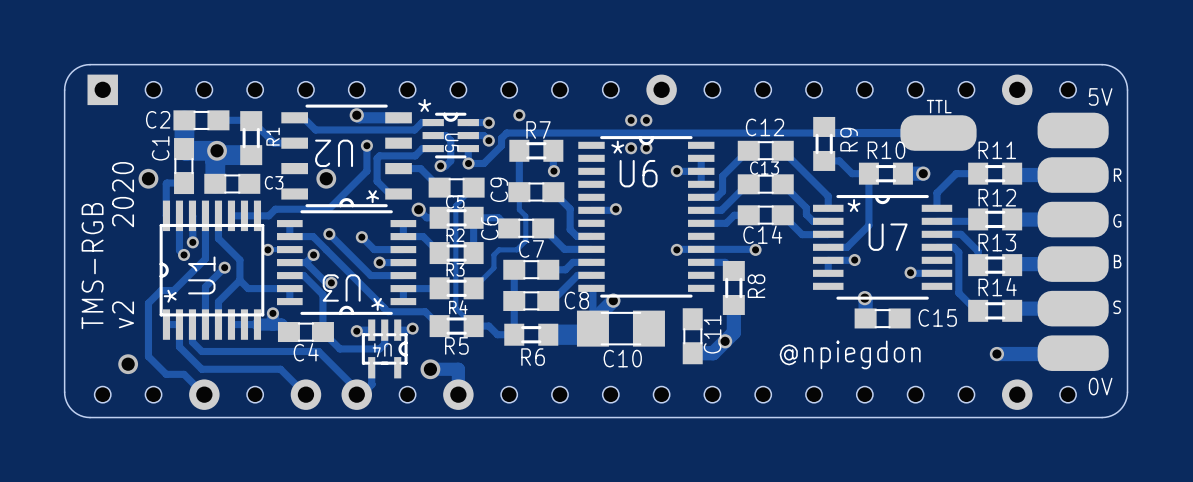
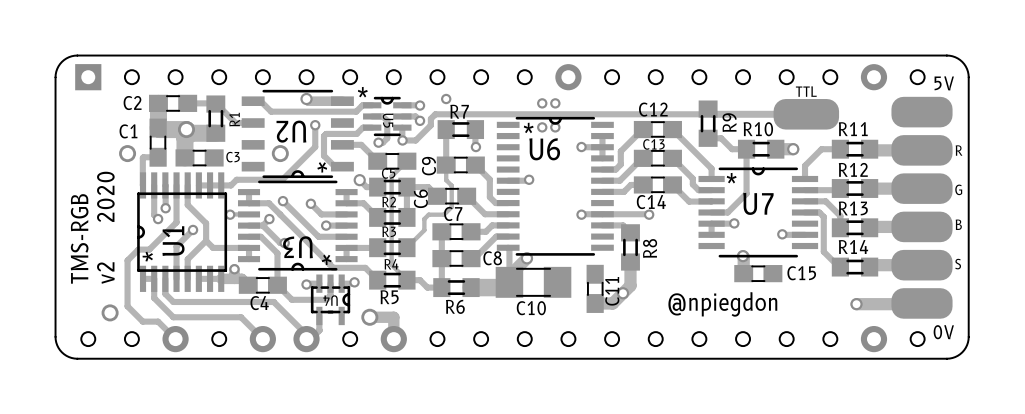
C1 name rotation: 0° (160, 148) -> 90° clockwise (128, 131)

